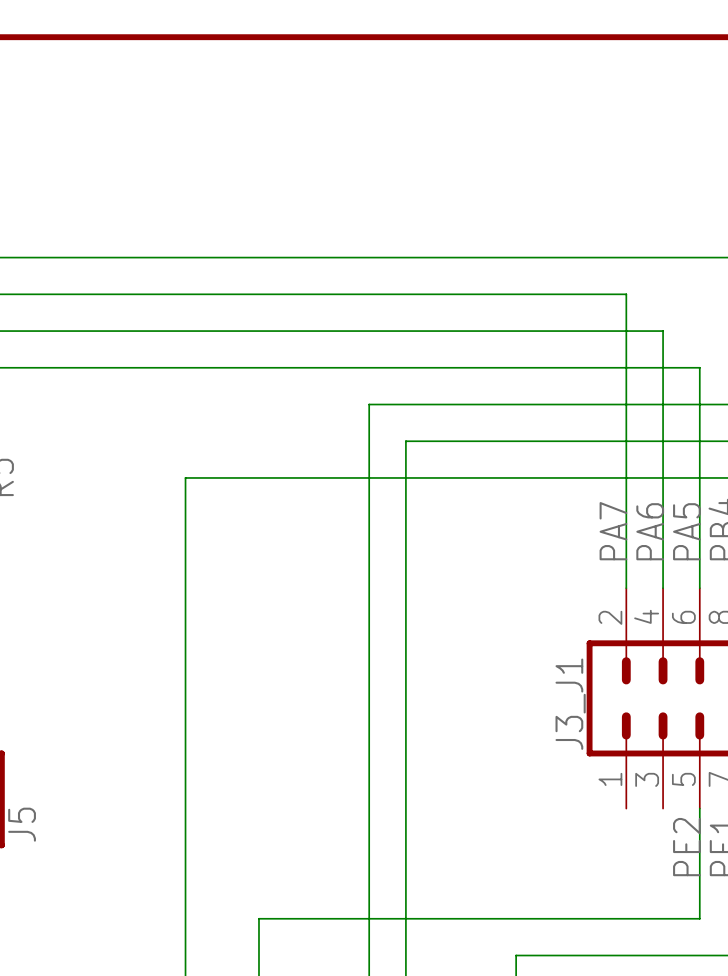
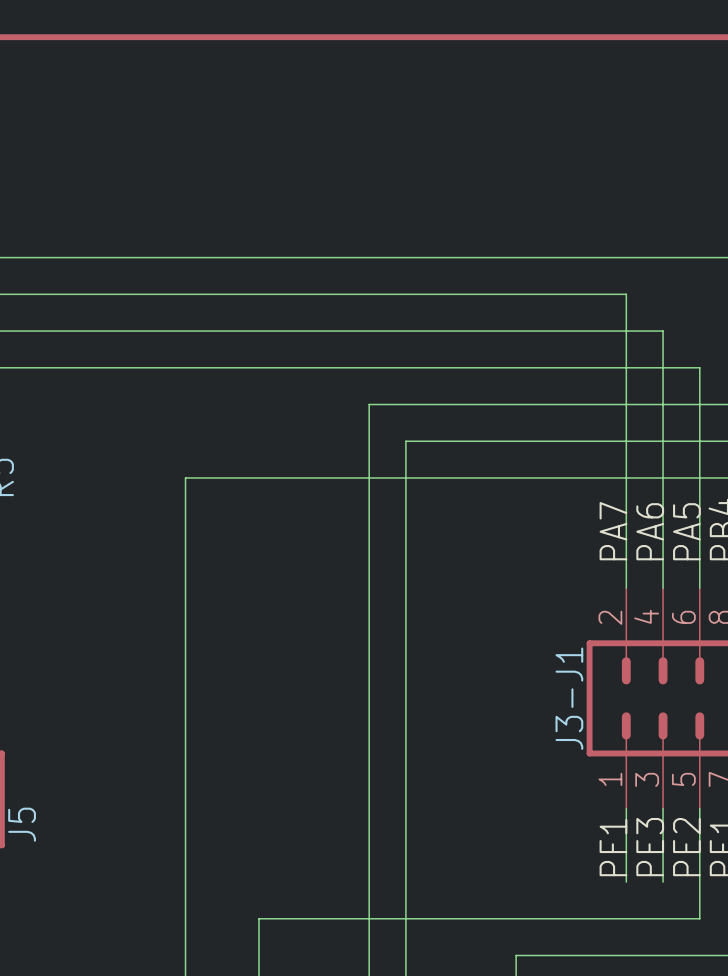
J3_J1 name: J3_J1 (570, 704) -> J3-J1 (569, 698)
wire: none -> (626, 808) (626, 882)
wire: none -> (663, 808) (663, 882)
label: none -> PF1 (613, 847)
label: none -> PE3 (650, 847)

